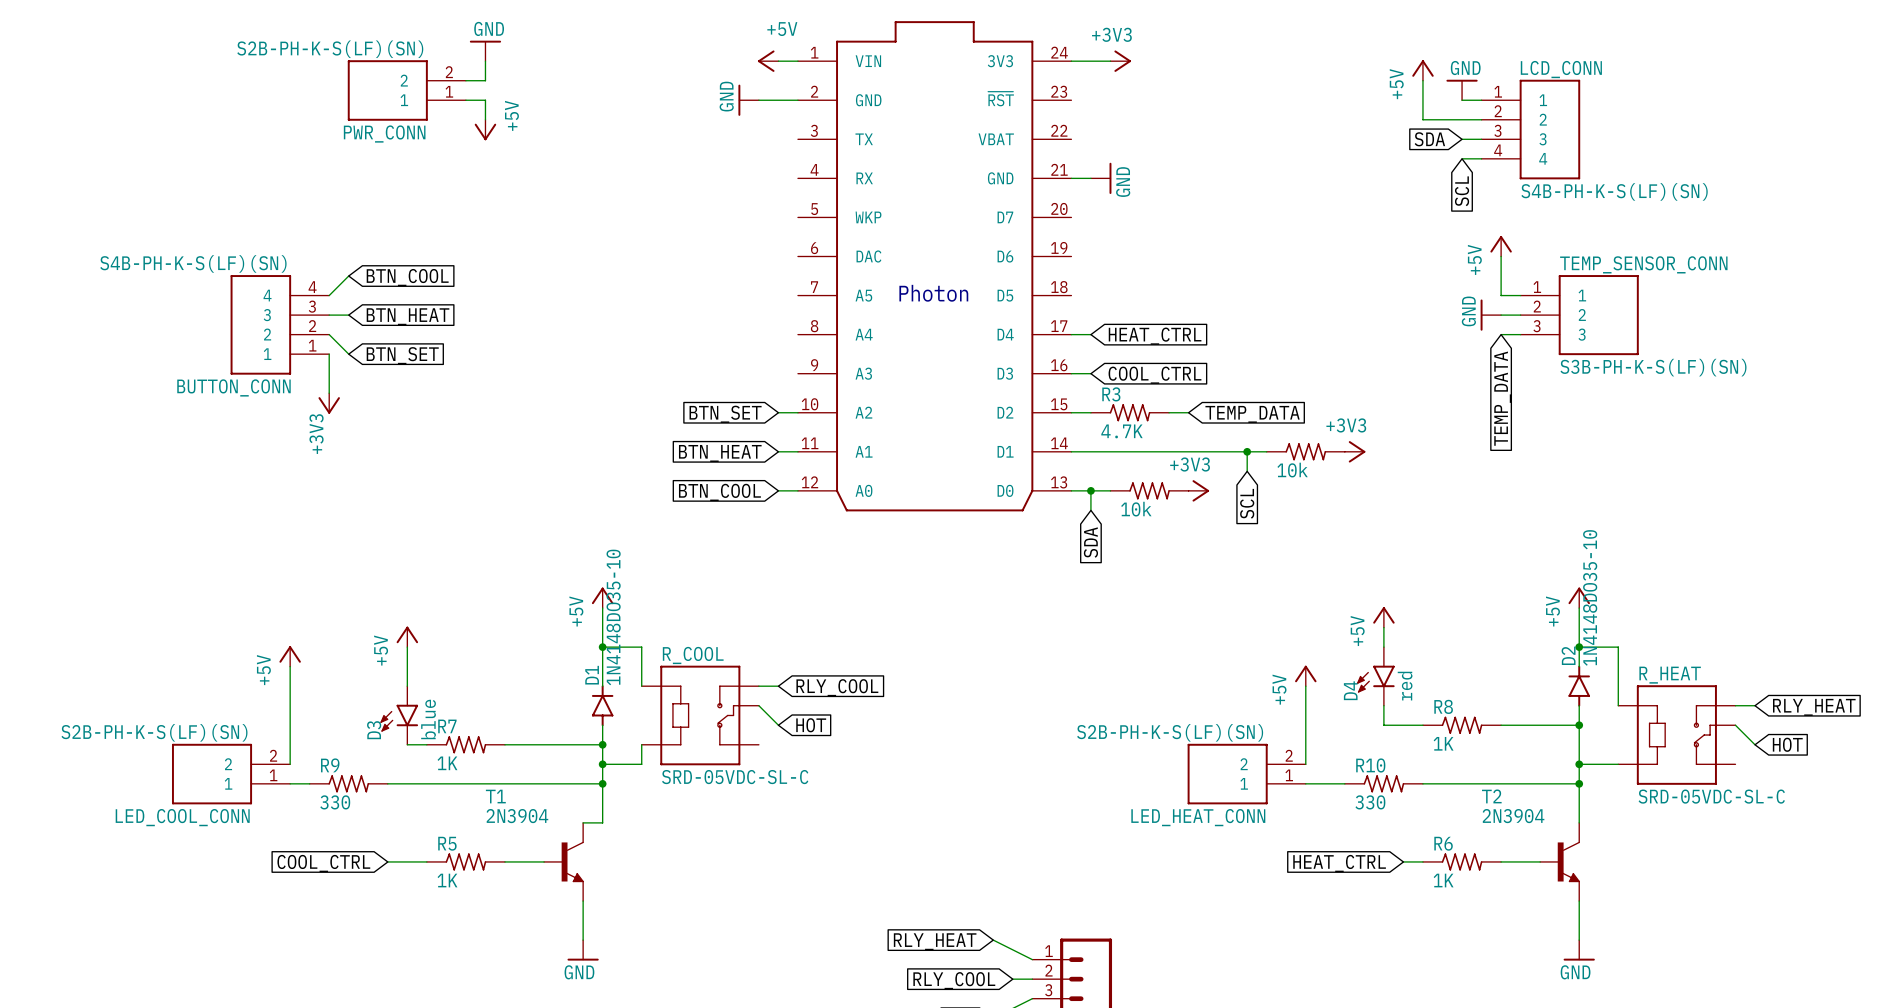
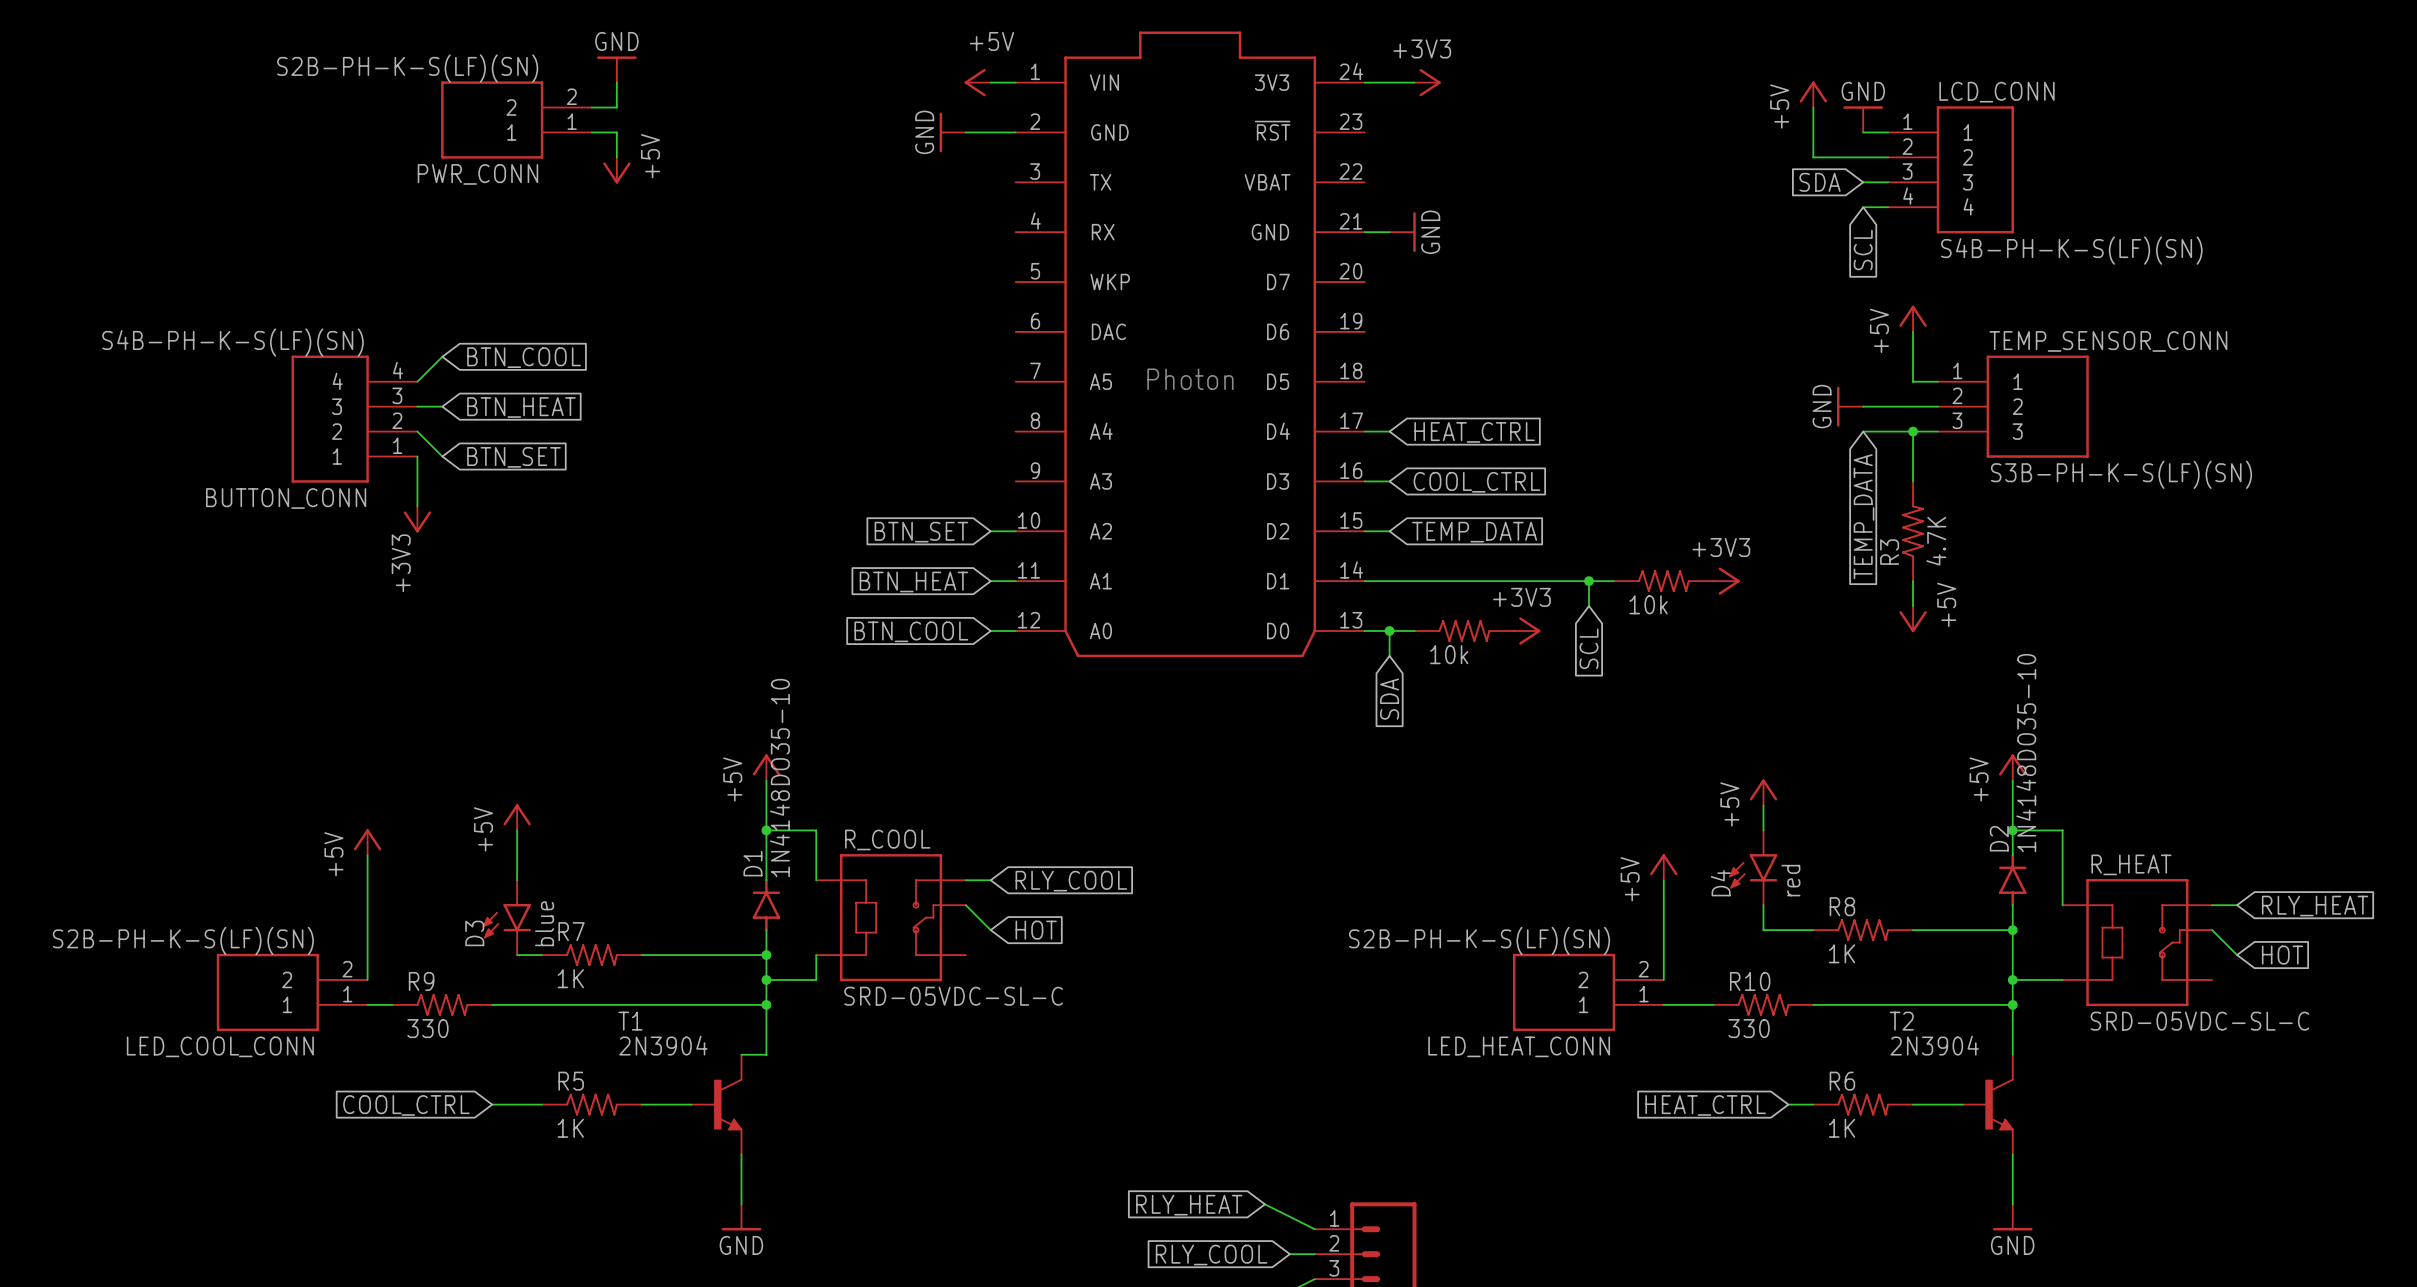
power symbol position: GND (1490, 315) -> GND (1850, 406)
wire: none -> (1863, 431) (1913, 431) (1913, 481)
junction: none -> (1913, 431)
global label position: TEMP_DATA (1502, 398) -> TEMP_DATA (1864, 516)
R3 rotation: 0° (1130, 412) -> 90° counterclockwise (1913, 531)
R3 position: (1130, 412) -> (1913, 531)
wire: (1169, 412) (1188, 412) -> none
global label position: TEMP_DATA (1252, 414) -> TEMP_DATA (1474, 532)
wire: none -> (1913, 581) (1913, 606)
power symbol: none -> +5V (1913, 619)

